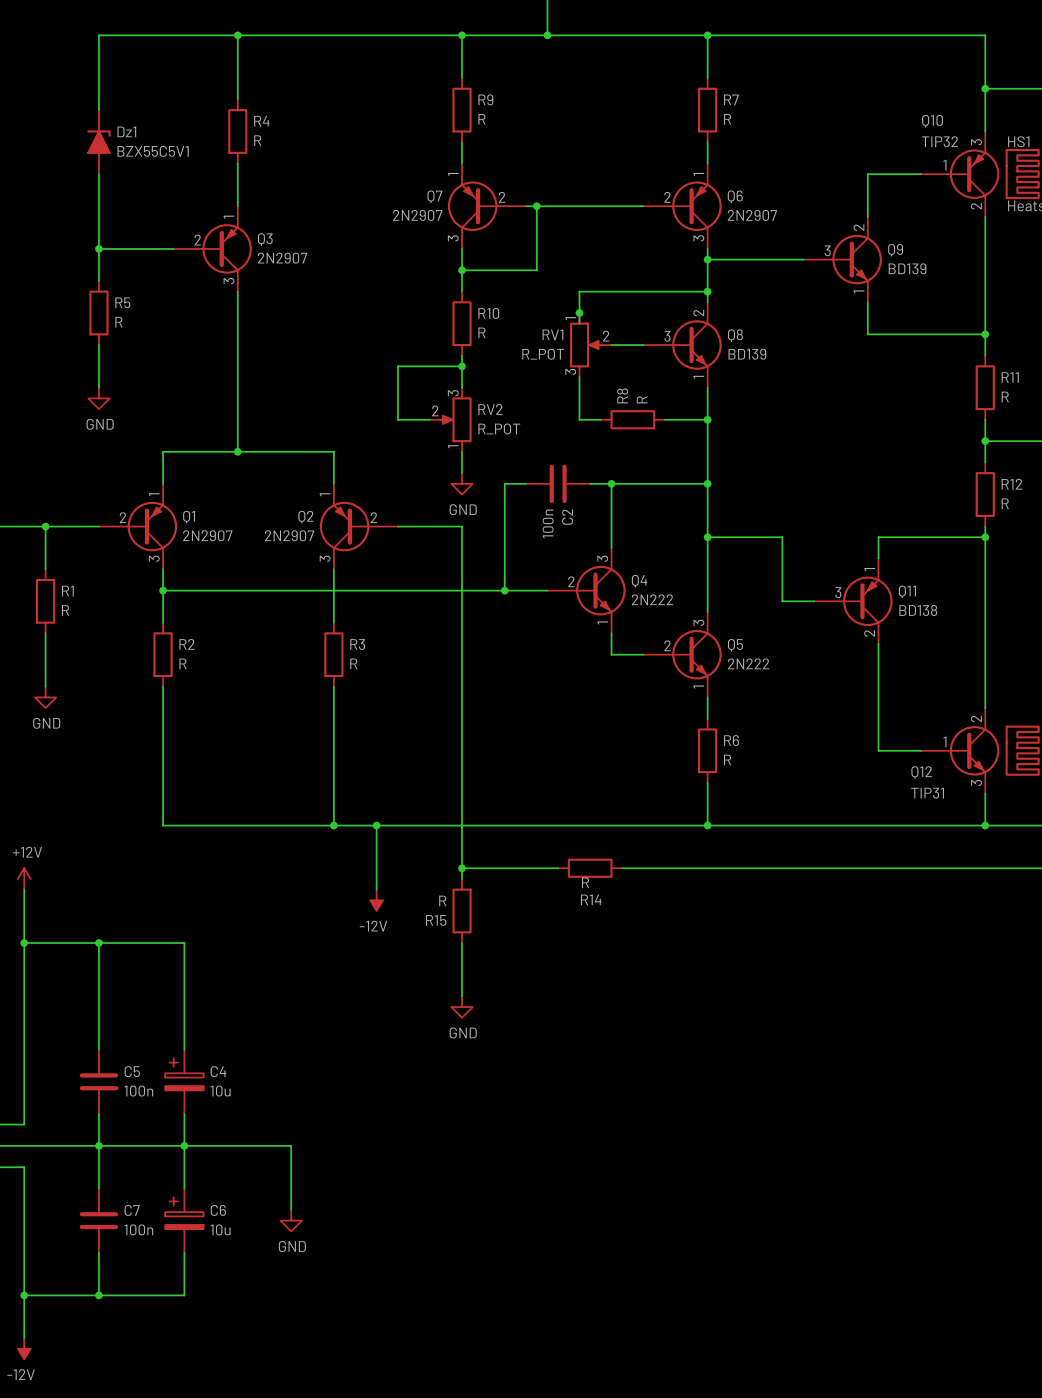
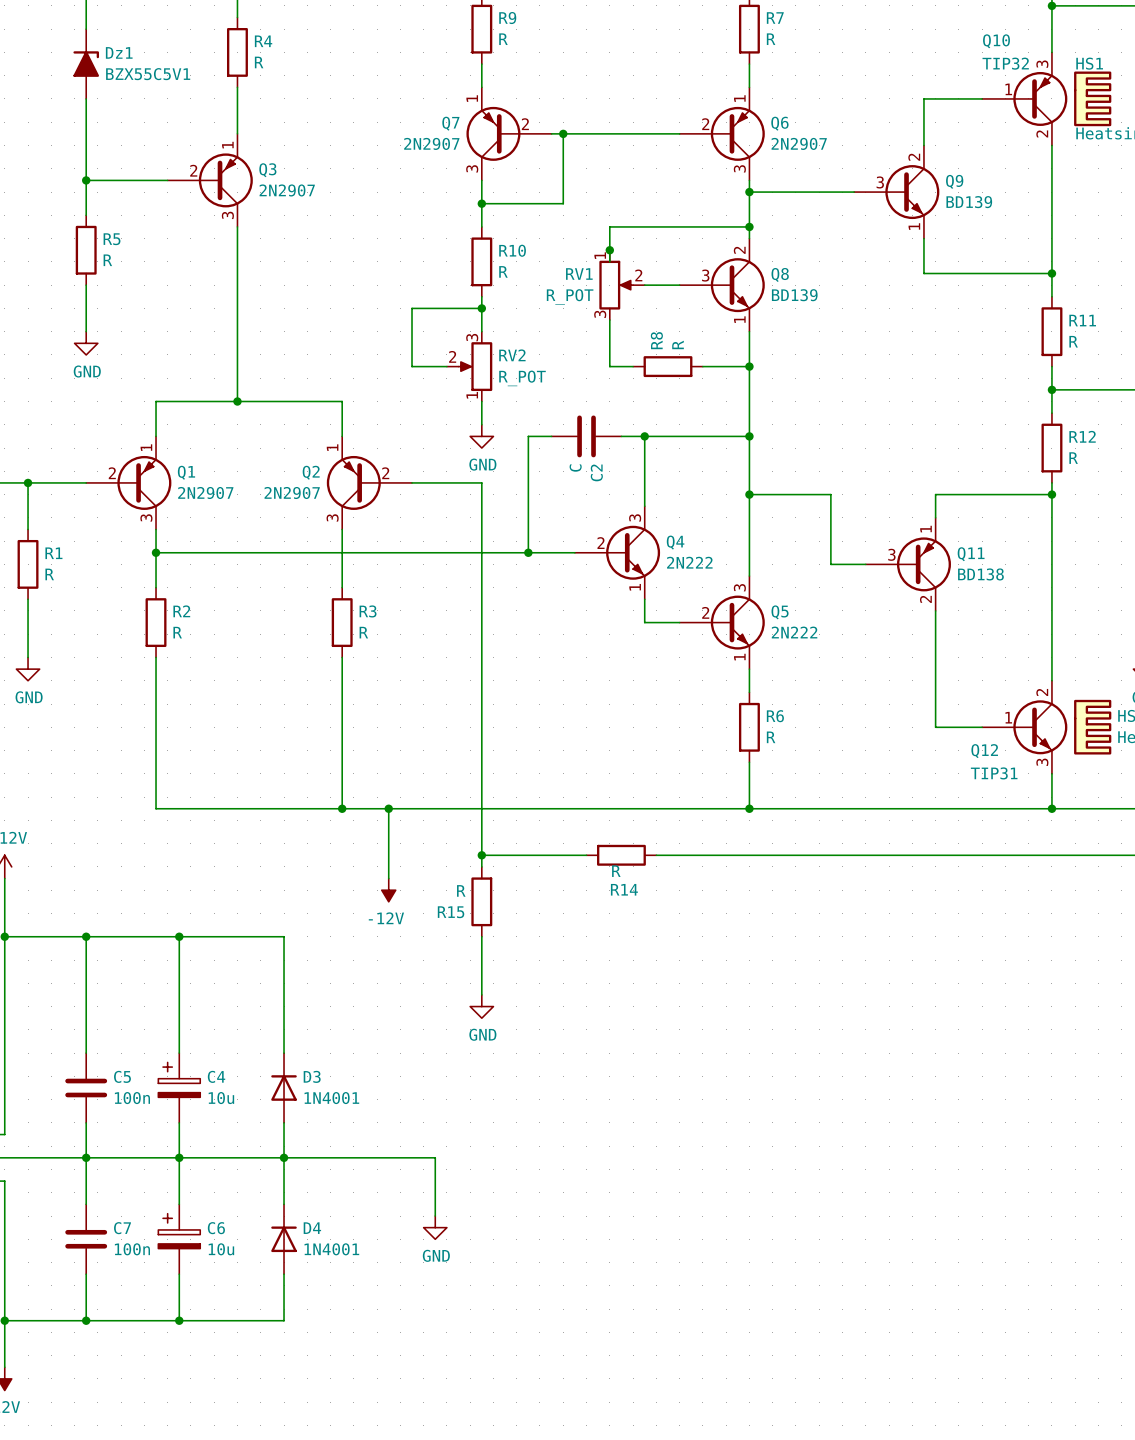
C2 value: 100n (548, 523) -> C (575, 468)
wire: none -> (179, 936) (284, 936) (284, 1053)
junction: none -> (179, 936)
D3: none -> 1N4001 (284, 1088)
wire: none -> (284, 1122) (284, 1204)
junction: none -> (284, 1157)
wire: (291, 1145) (291, 1209) -> (295, 1157) (435, 1157) (435, 1216)
D4: none -> 1N4001 (284, 1239)
power symbol position: GND (291, 1220) -> GND (435, 1227)
wire: none -> (284, 1274) (284, 1320) (179, 1320)
junction: none -> (179, 1320)

